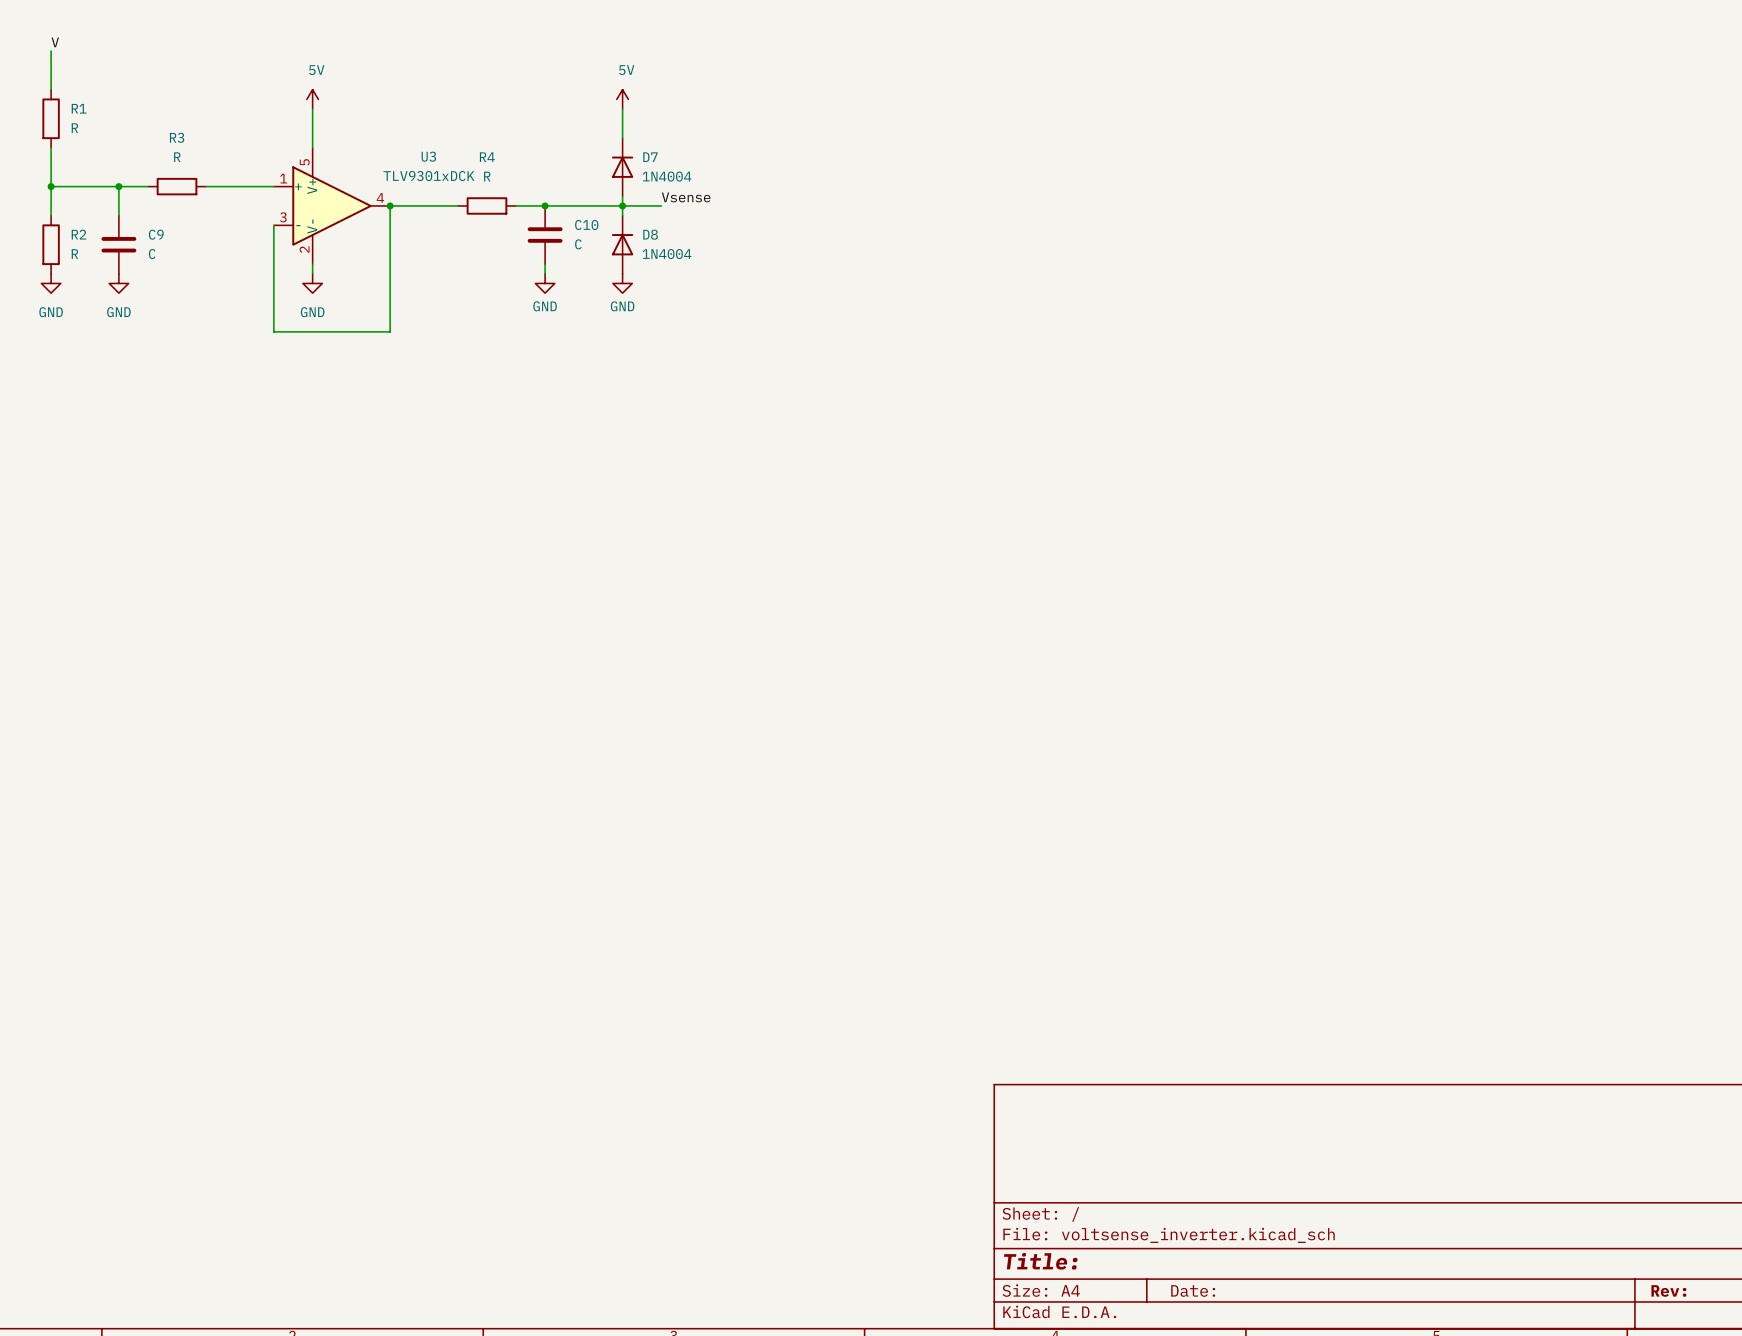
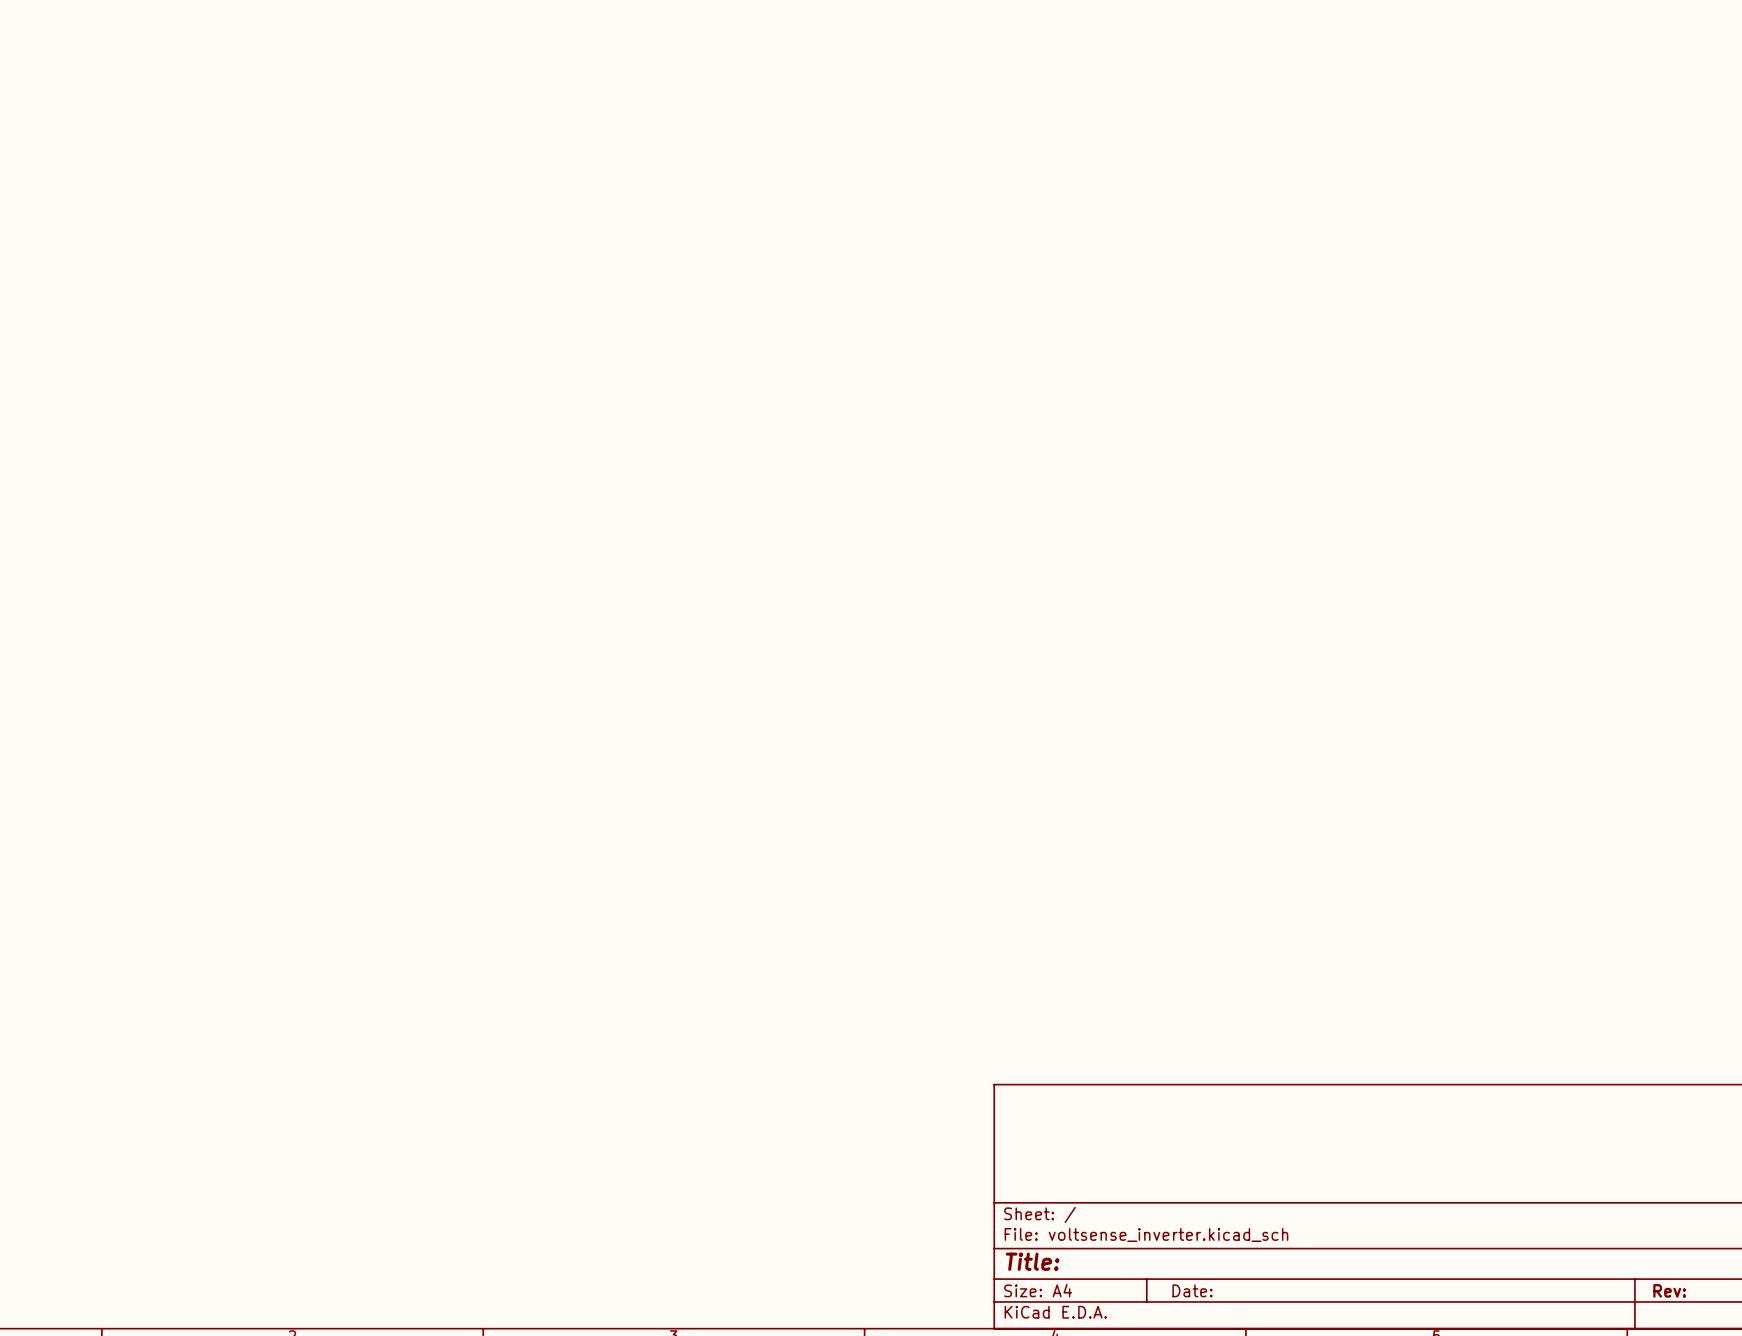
label: V (55, 42) -> none
wire: (51, 50) (51, 89) -> none
power symbol: 5V (312, 99) -> none
power symbol: 5V (622, 99) -> none
wire: (312, 109) (312, 147) -> none
wire: (622, 109) (622, 138) -> none
R1: R (51, 118) -> none
wire: (51, 147) (51, 215) -> none
D7: 1N4004 (622, 167) -> none
wire: (51, 186) (147, 186) -> none
junction: (51, 186) -> none
wire: (118, 186) (118, 215) -> none
junction: (118, 186) -> none
R3: R (177, 186) -> none
wire: (206, 186) (273, 186) -> none
wire: (622, 196) (622, 215) -> none
label: Vsense (686, 197) -> none
U3: TLV9301xDCK (332, 205) -> none
junction: (390, 205) -> none
wire: (457, 205) (390, 205) (390, 331) (273, 331) (273, 225) -> none
R4: R (486, 205) -> none
wire: (516, 205) (661, 205) -> none
junction: (545, 205) -> none
junction: (622, 205) -> none
C10: C (545, 235) -> none
R2: R (51, 244) -> none
C9: C (118, 244) -> none
D8: 1N4004 (622, 244) -> none
wire: (312, 264) (312, 273) -> none
wire: (545, 264) (545, 273) -> none
power symbol: GND (51, 283) -> none
power symbol: GND (118, 283) -> none
power symbol: GND (312, 283) -> none
power symbol: GND (545, 283) -> none
power symbol: GND (622, 283) -> none

